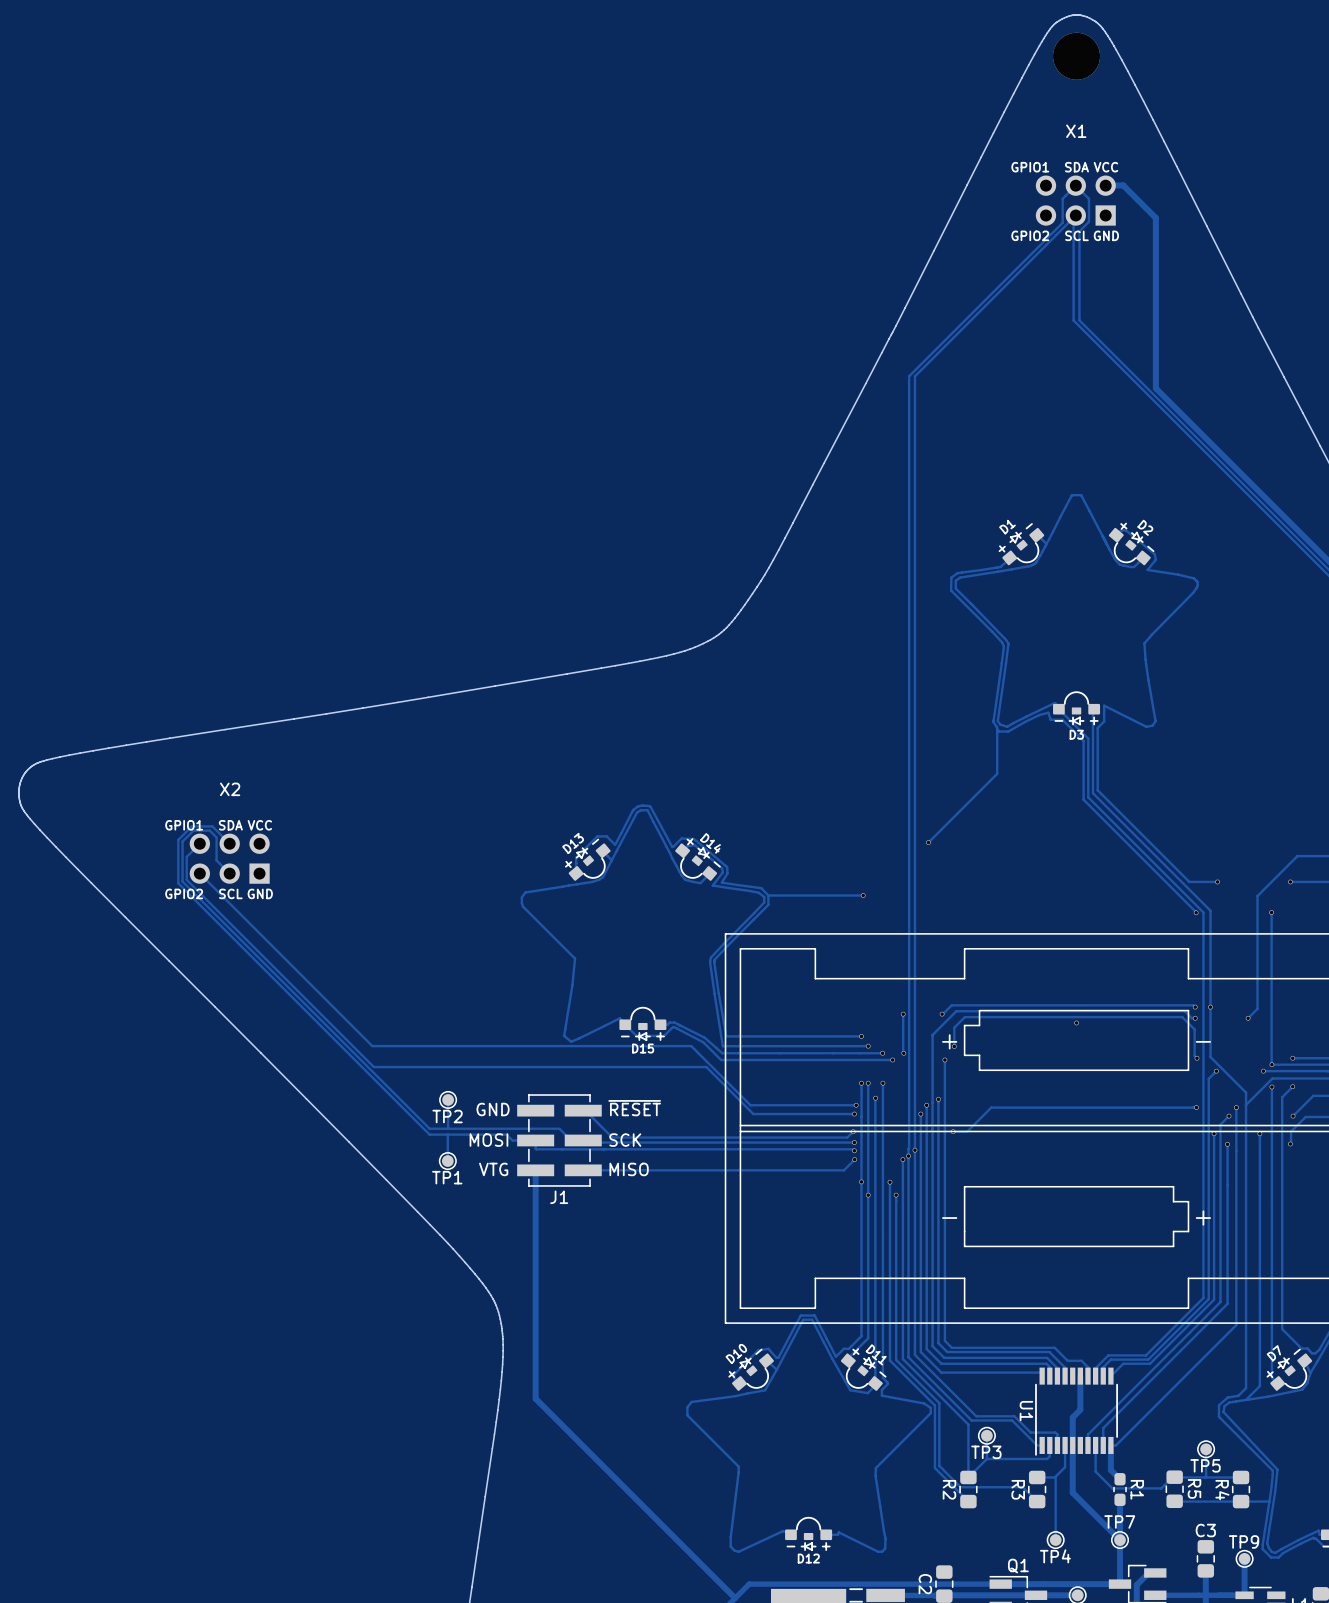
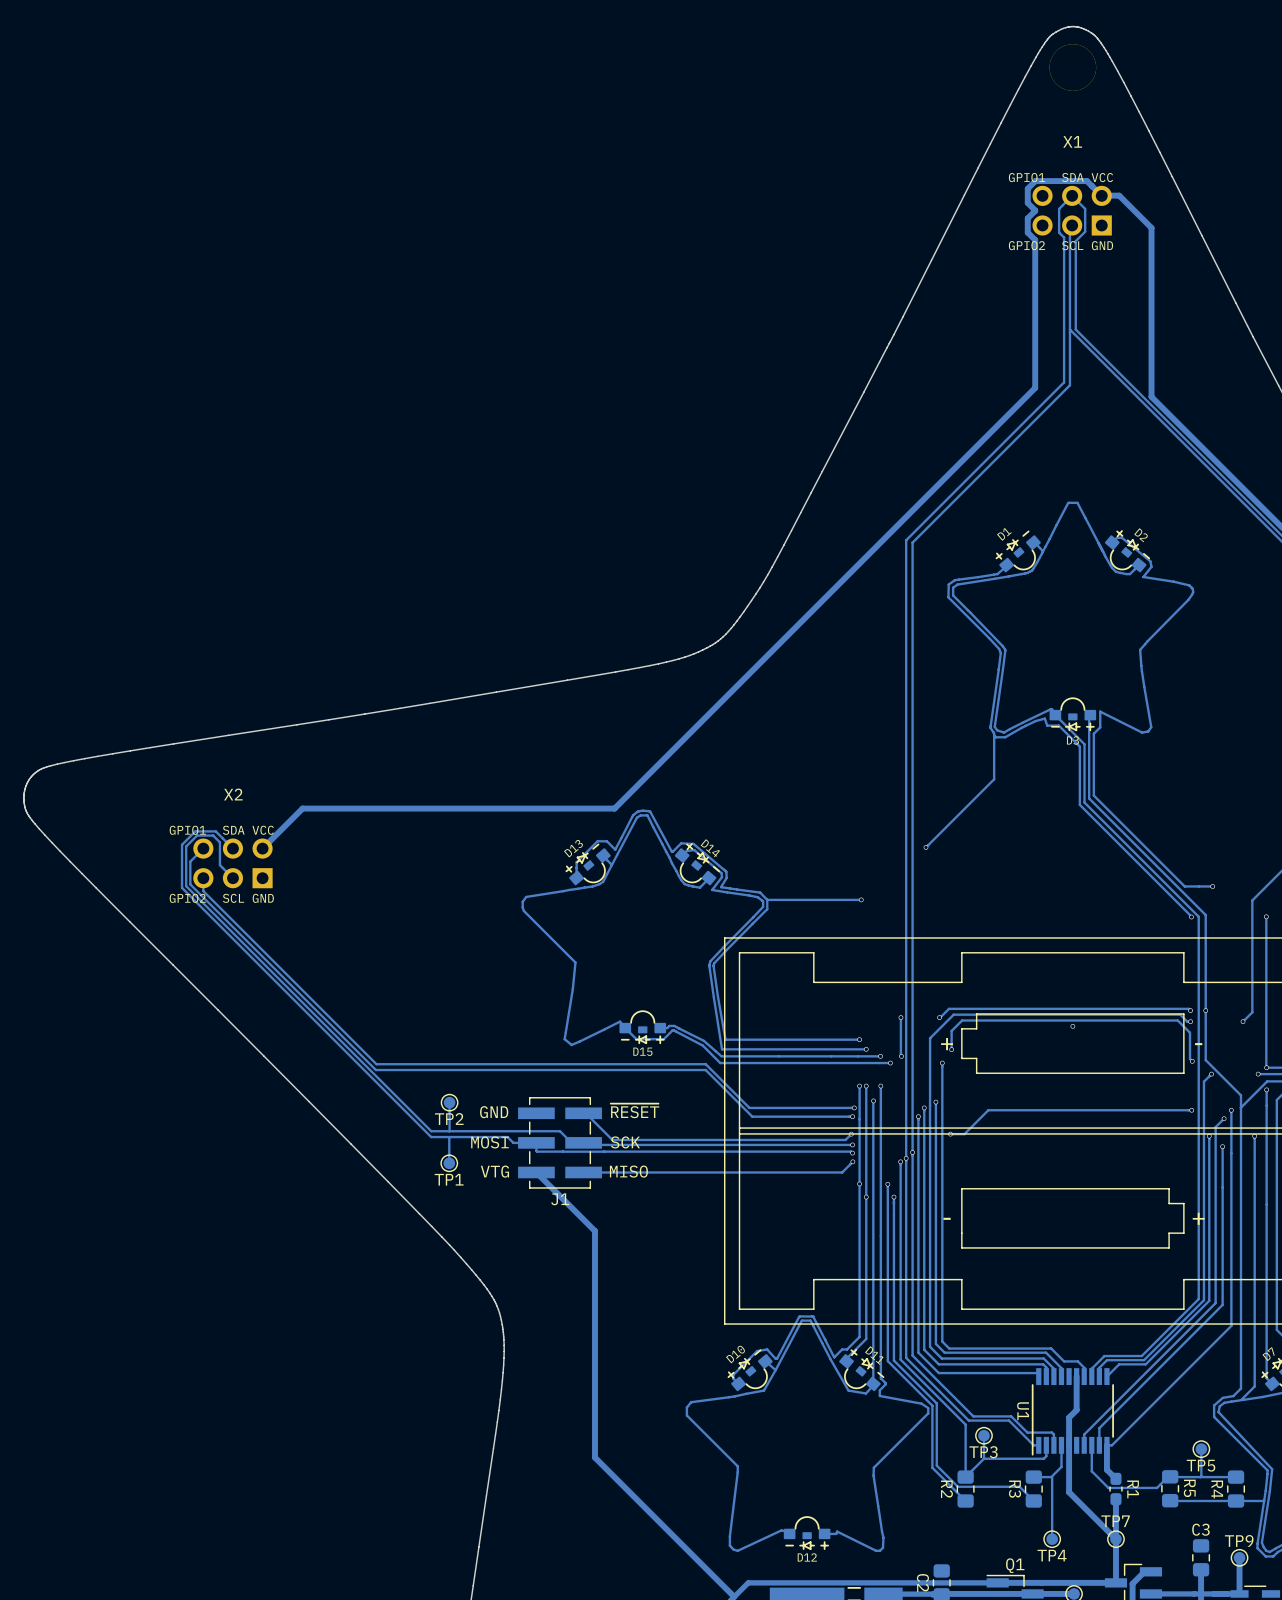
track: none -> (1101, 195) (1086, 181) (1035, 181) (1027, 188) (1027, 202) (1035, 210) (1027, 218) (1027, 232) (1035, 240) (1035, 387) (614, 808) (302, 808) (262, 848)
track: (1075, 215) (914, 376) (914, 535) -> (1069, 329) (1069, 385) (912, 542)
track: (1062, 222) (909, 376) (908, 1148) -> (1059, 232) (1064, 237) (1064, 382) (906, 540) (906, 1151)
track: (199, 873) (372, 1046) (691, 1046) (706, 1061) -> (203, 878) (203, 891) (376, 1064) (705, 1064)
track: (535, 1170) (535, 1398) (594, 1457) -> (536, 1172) (594, 1231) (594, 1457)

